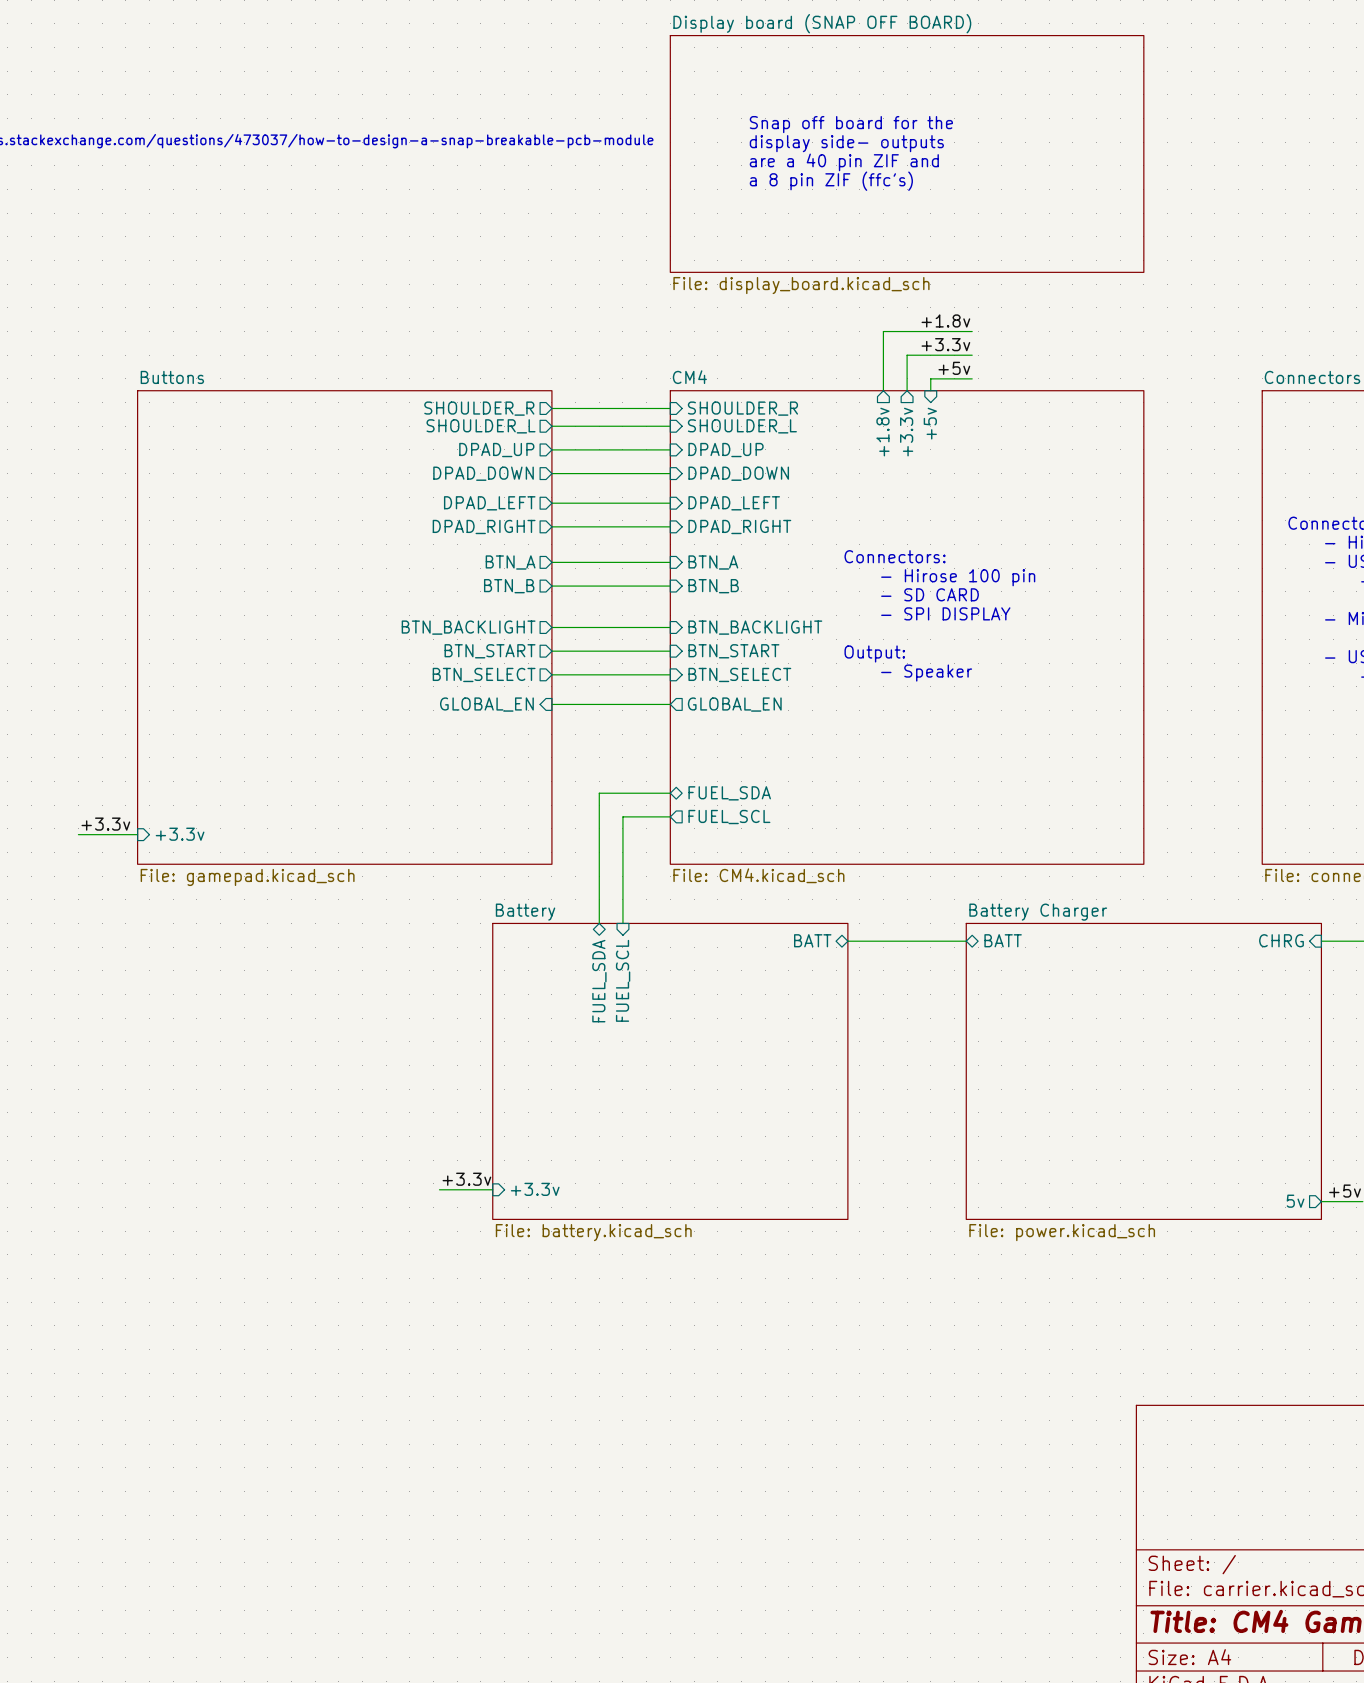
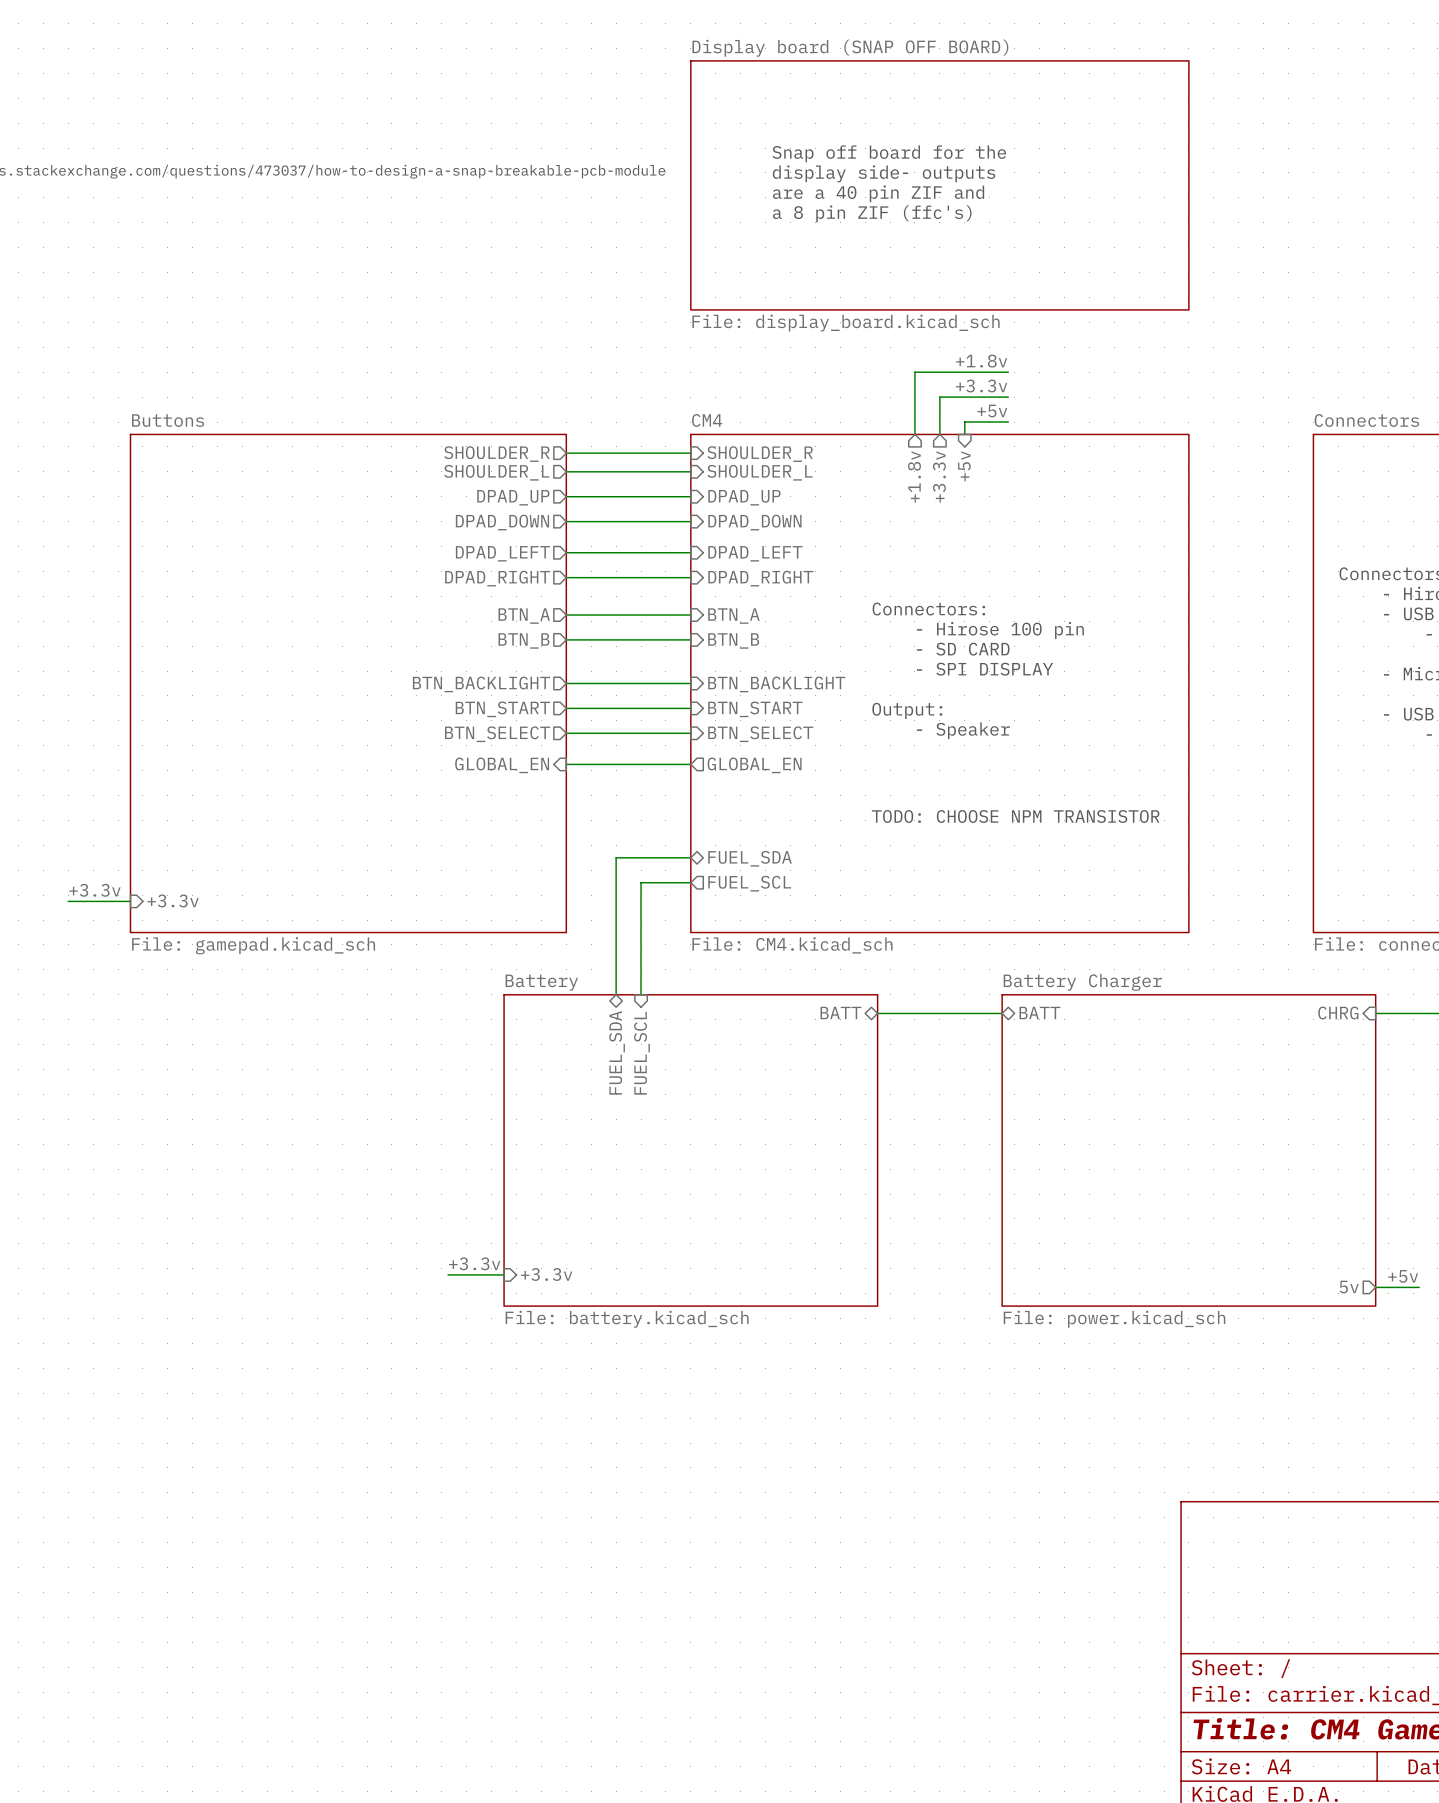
text: none -> TODO: CHOOSE NPM TRANSISTOR (1015, 816)

